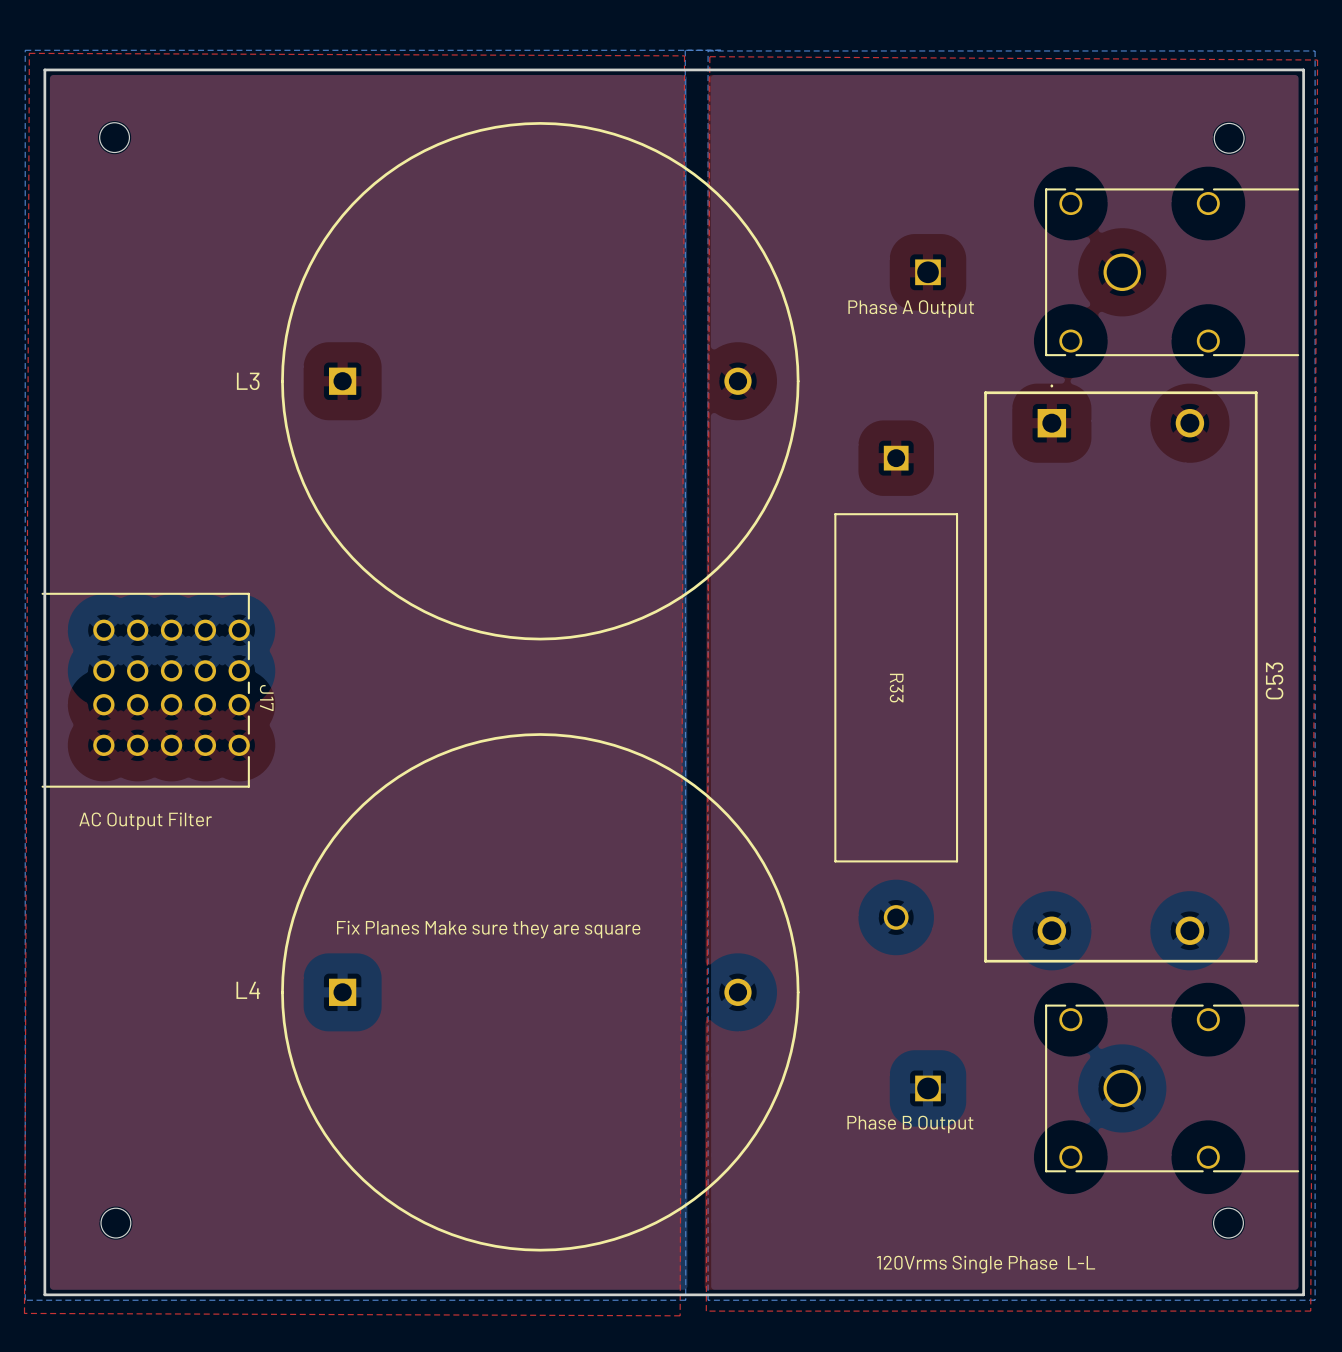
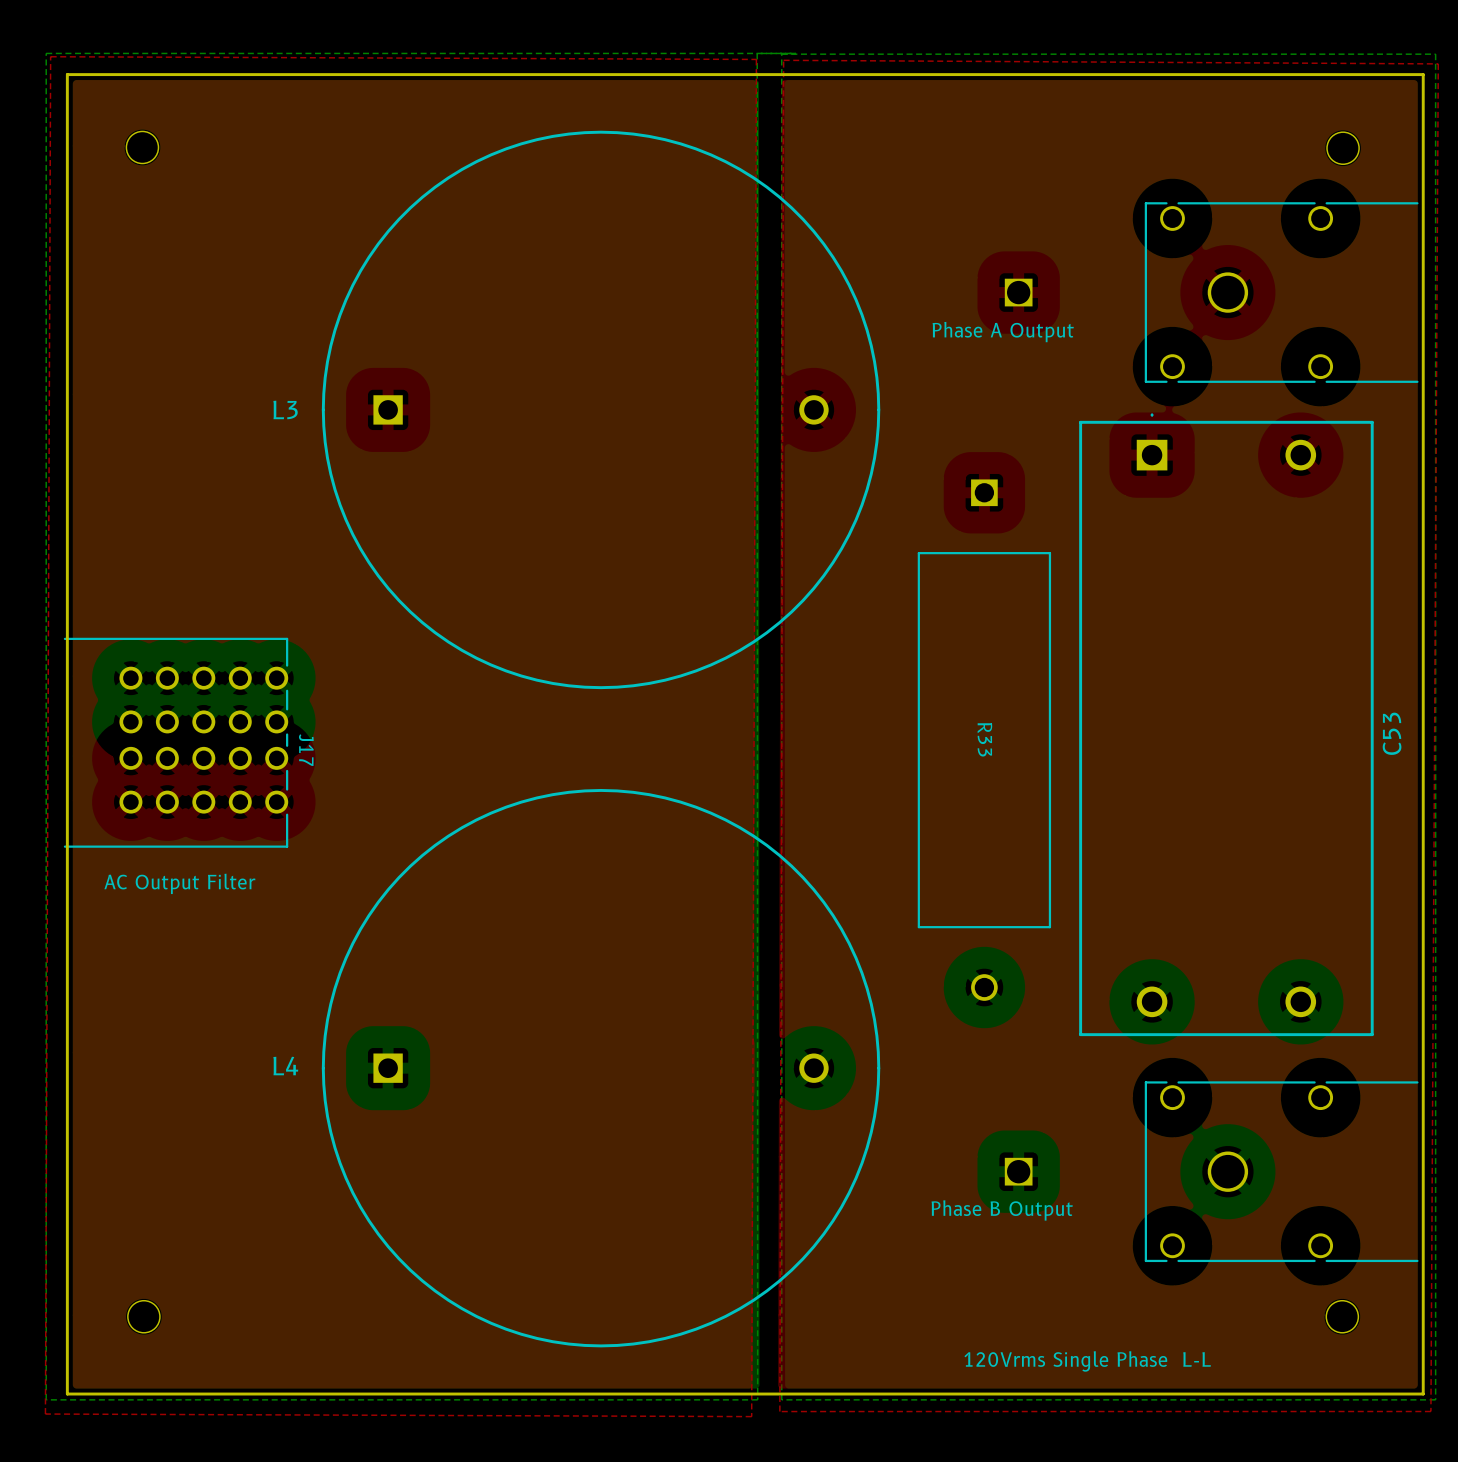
text: Fix Planes Make sure they are square (488, 929) -> none

